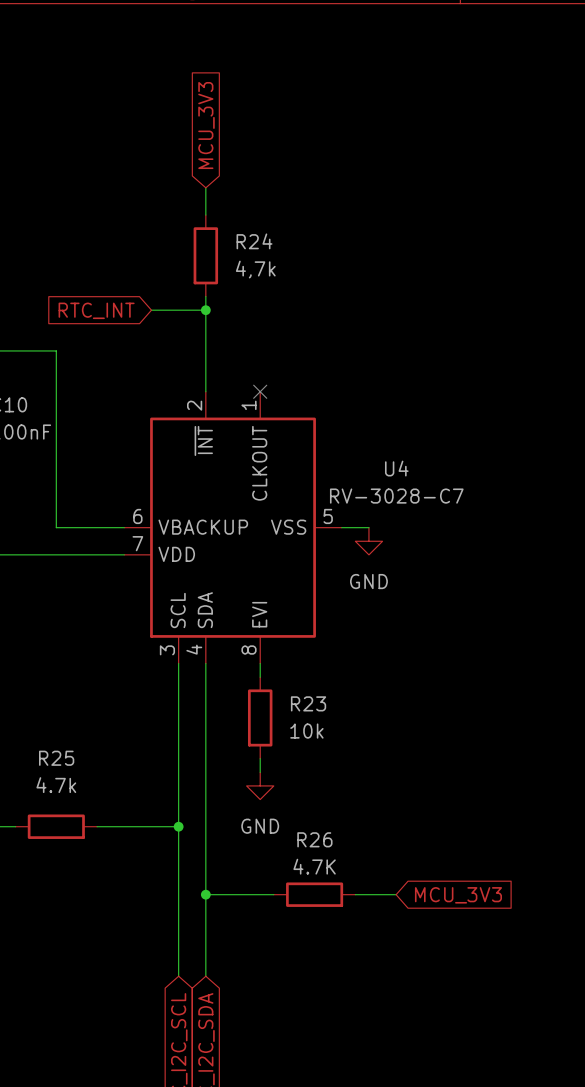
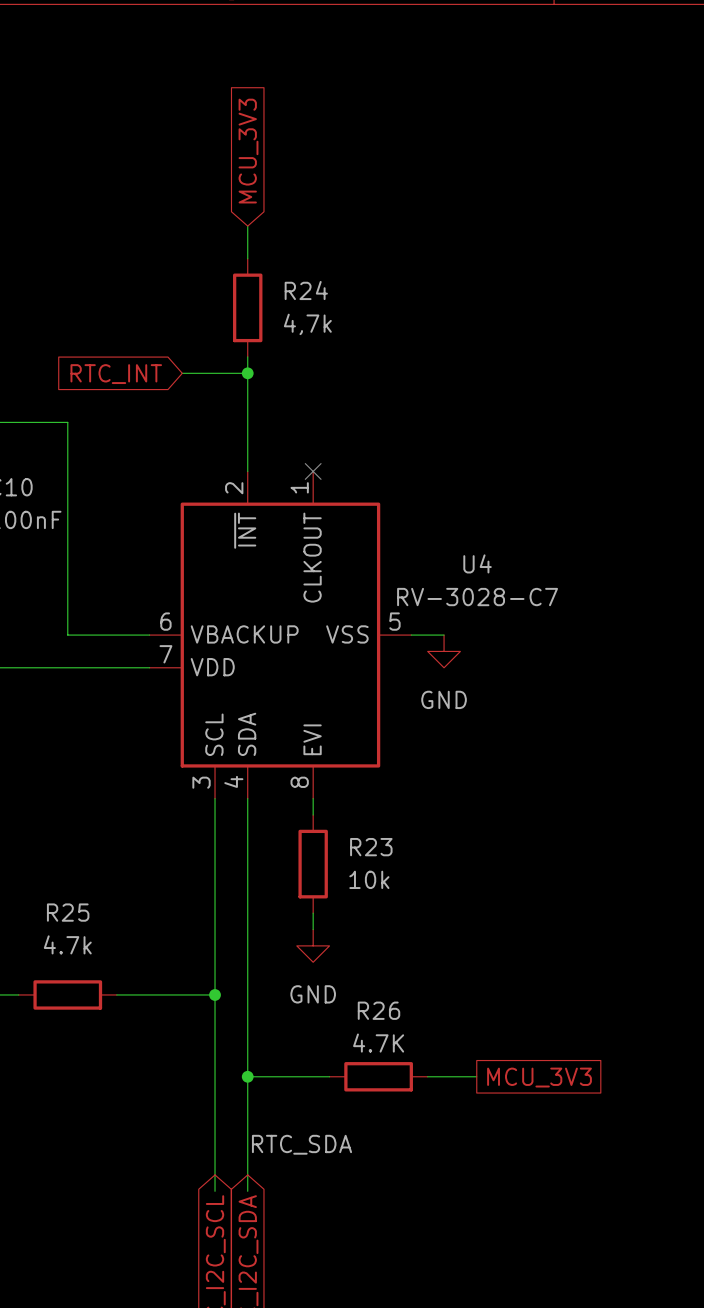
global label shape: input (458, 895) -> passive (539, 1077)
label: none -> RTC_SDA (302, 1144)
wire: none -> (215, 1174) (215, 1191)
wire: none -> (247, 1174) (247, 1191)

